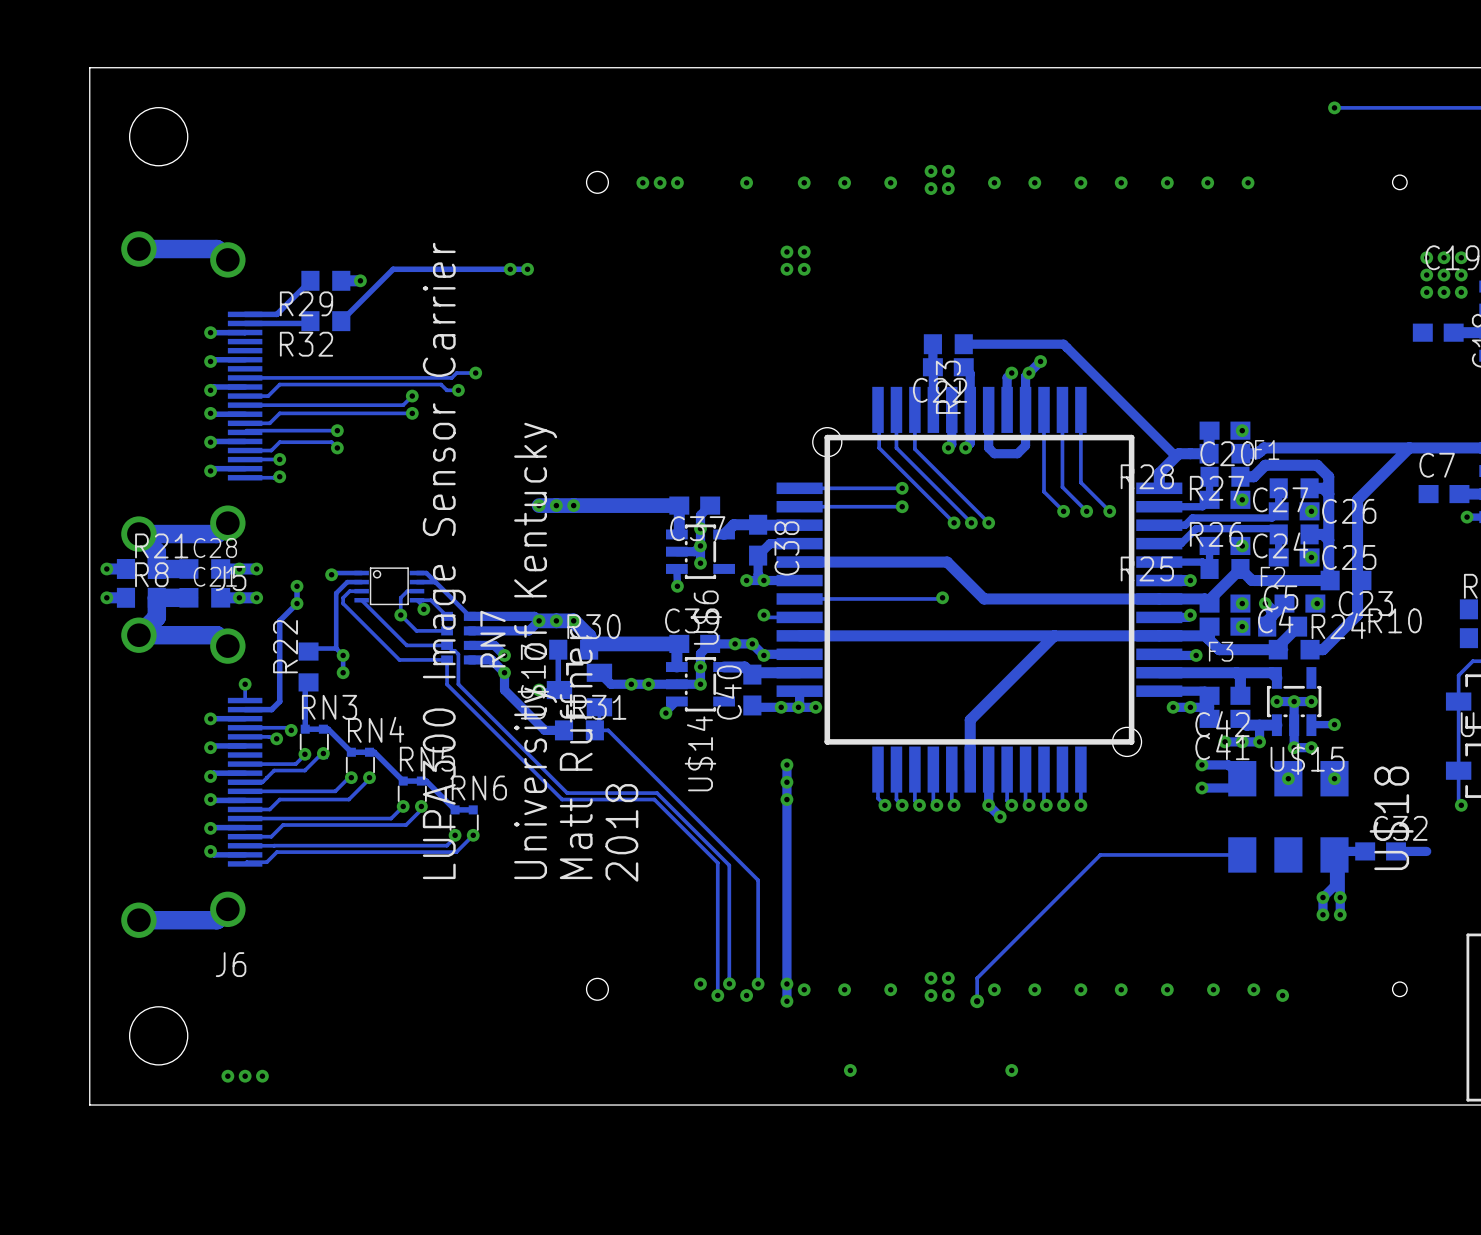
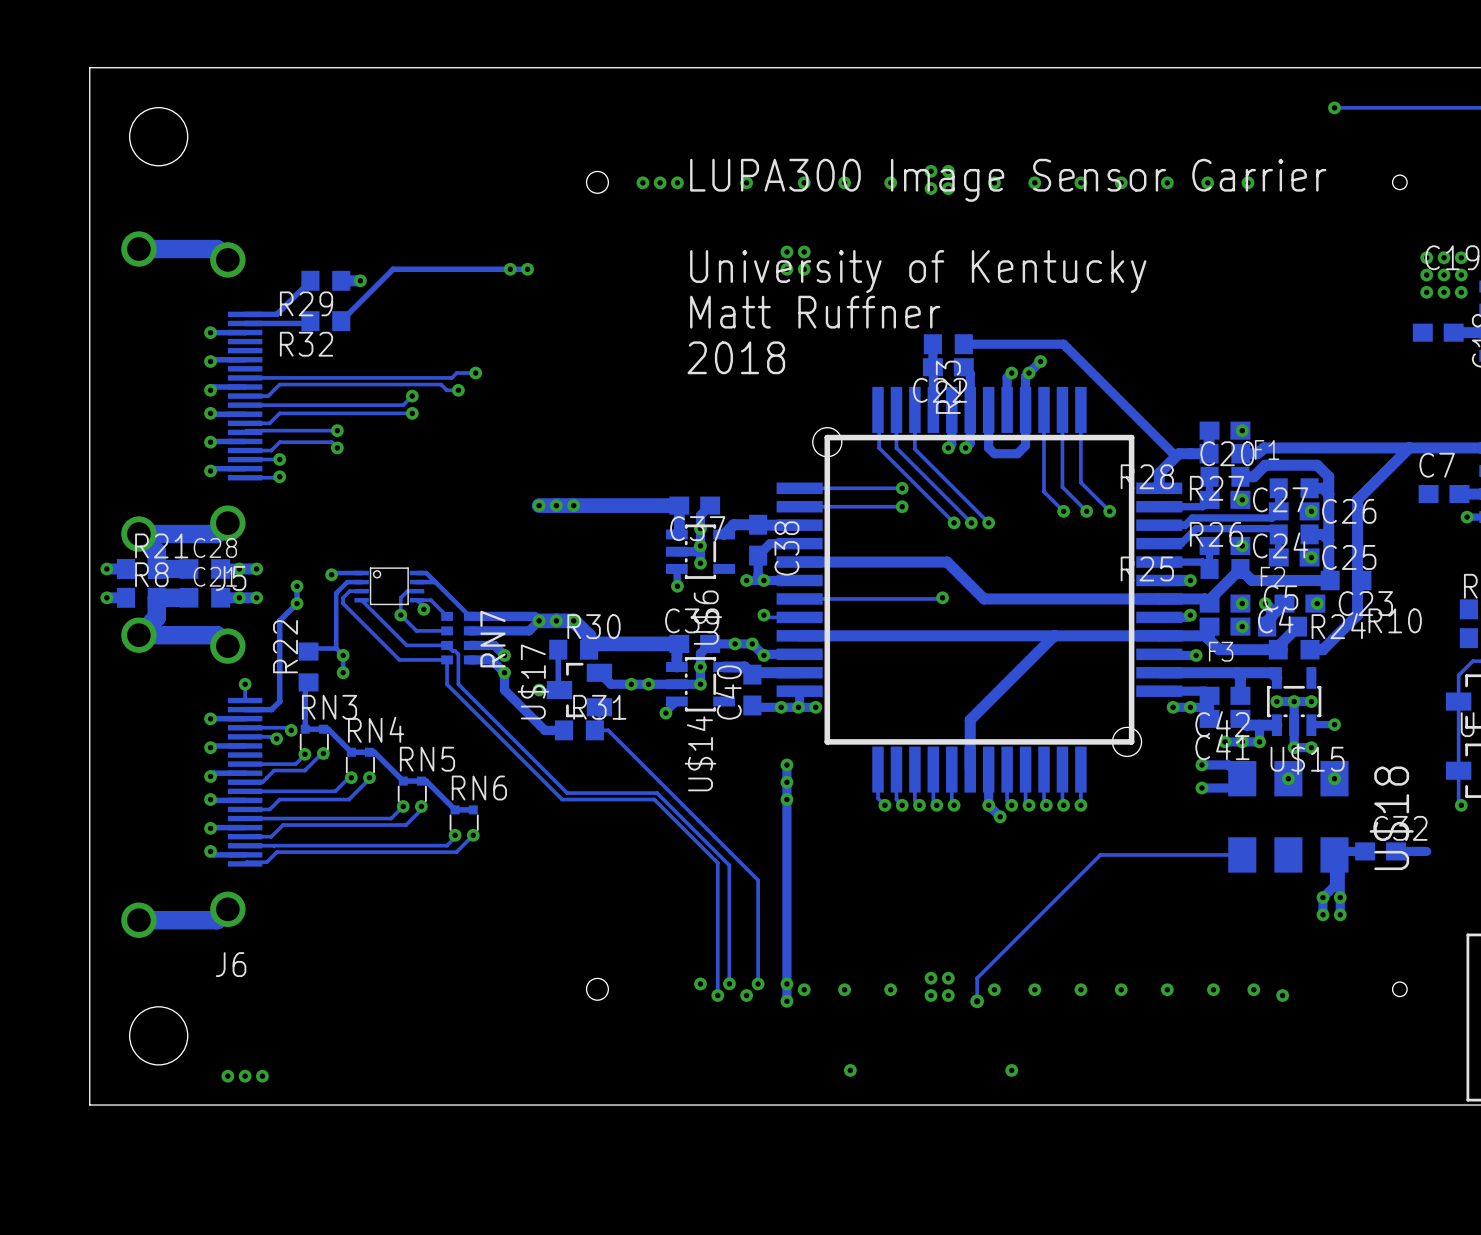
text: none -> LUPA300 Image Sensor Carrier (1008, 180)
text: none -> University of Kentucky (918, 271)
text: none -> Matt Ruffner (815, 312)
text: none -> 2018 (736, 357)
text: LUPA300 Image Sensor Carrier (444, 560) -> none
text: University of Kentucky (535, 650) -> none
text: Matt Ruffner (576, 753) -> none
text: 2018 (621, 832) -> none

